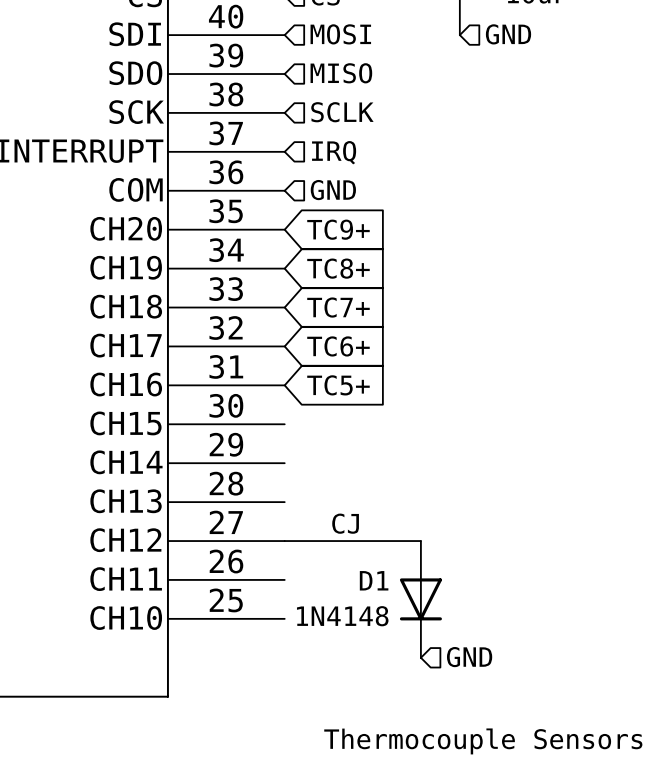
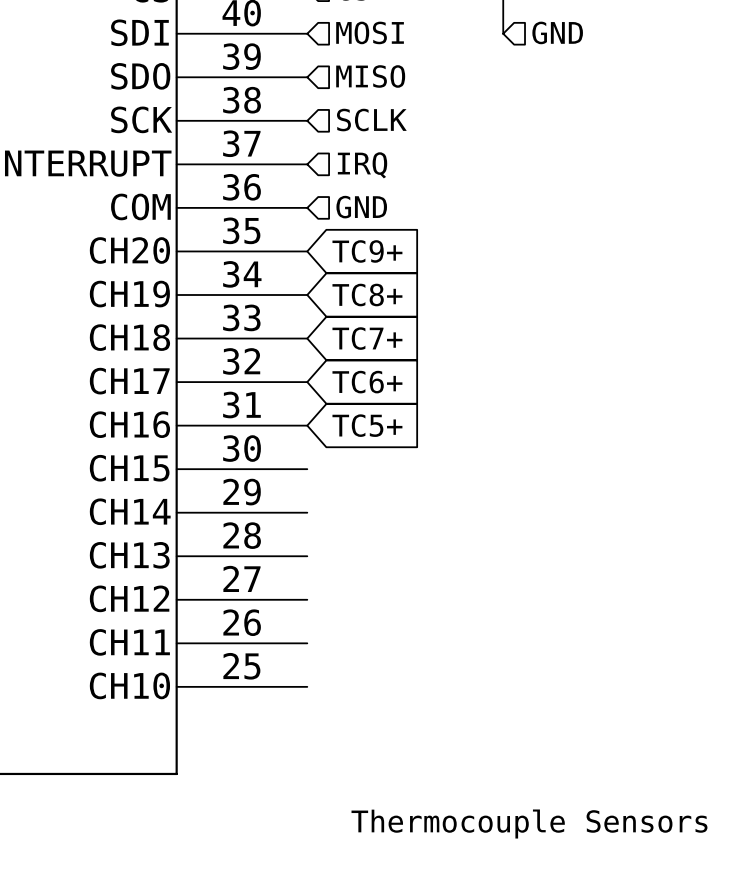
label: CJ (345, 523) -> none
wire: (284, 541) (420, 541) -> none
D1: 1N4148 (420, 599) -> none
hierarchical label: GND (469, 657) -> none

